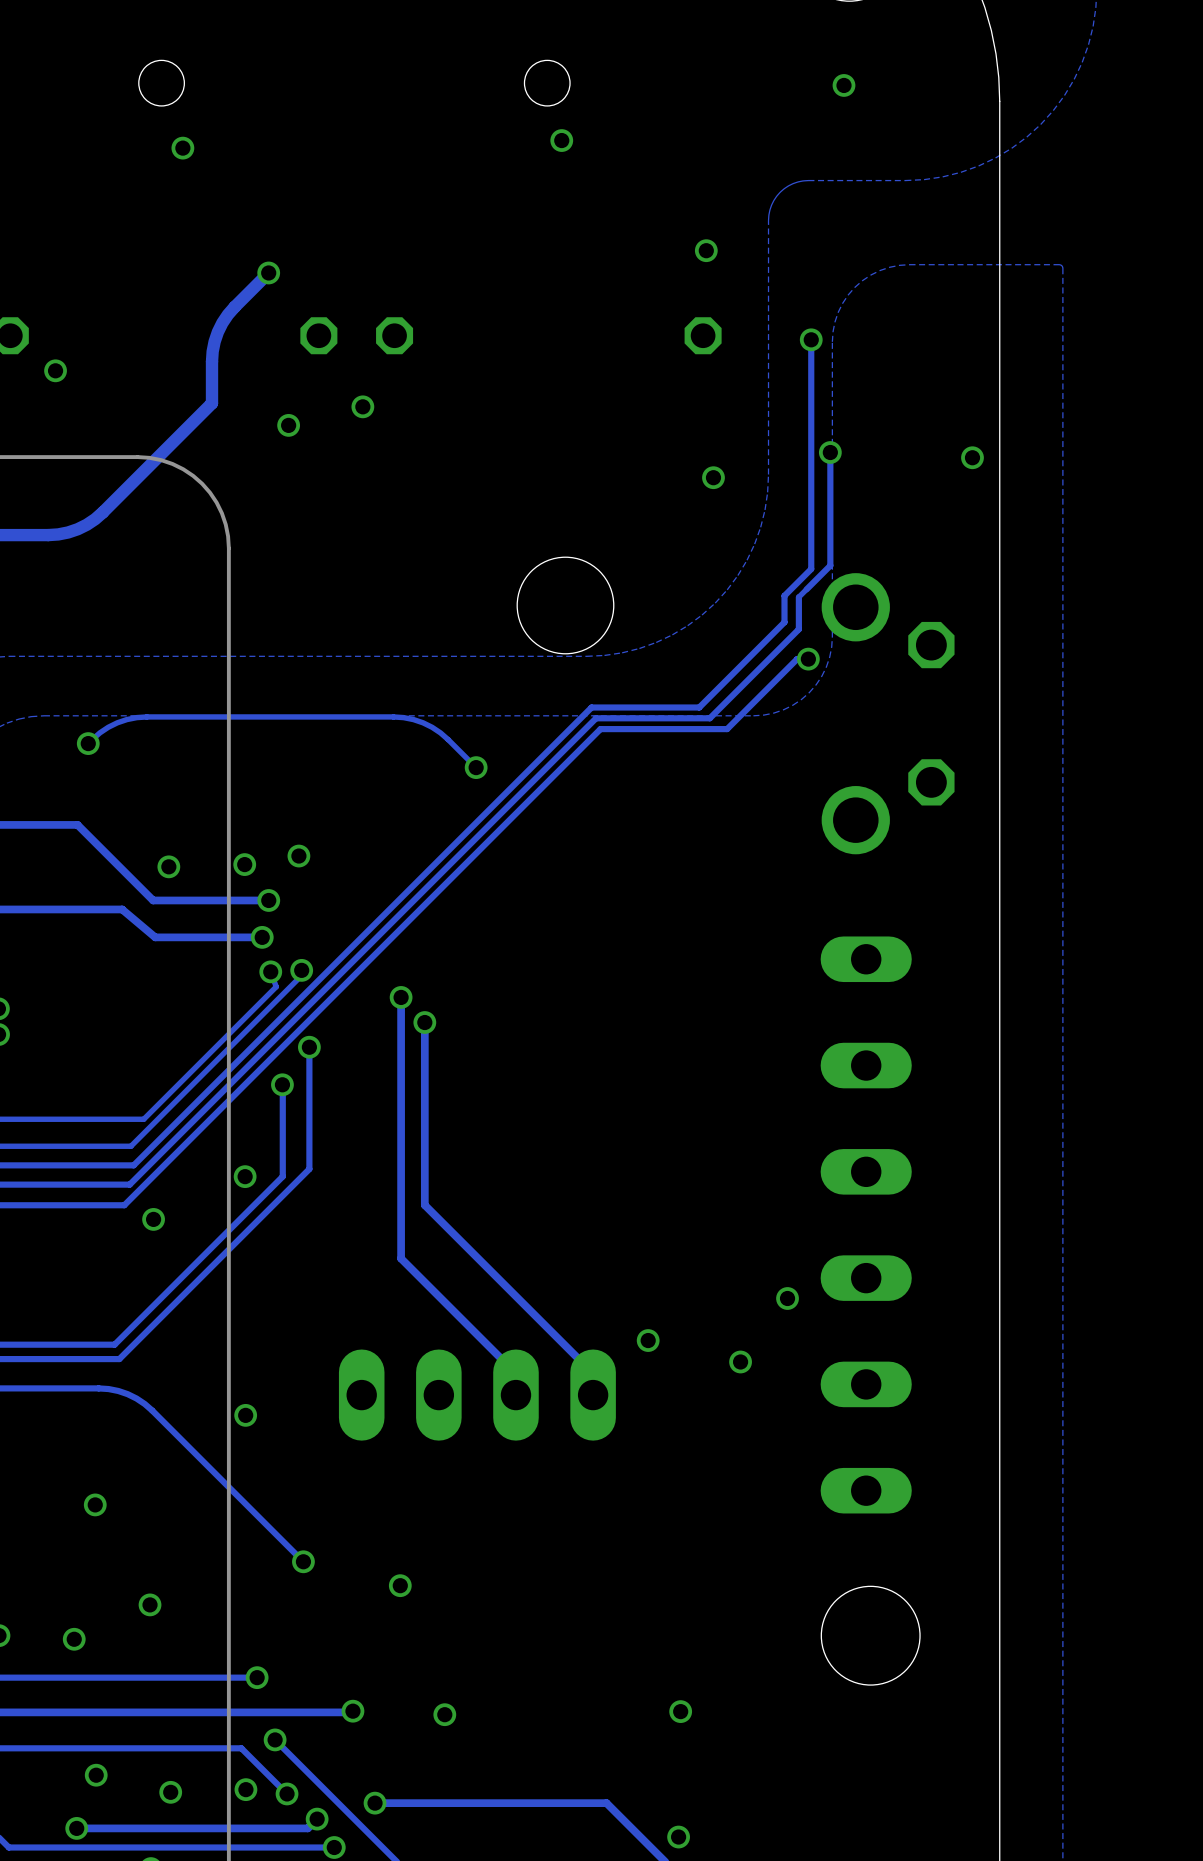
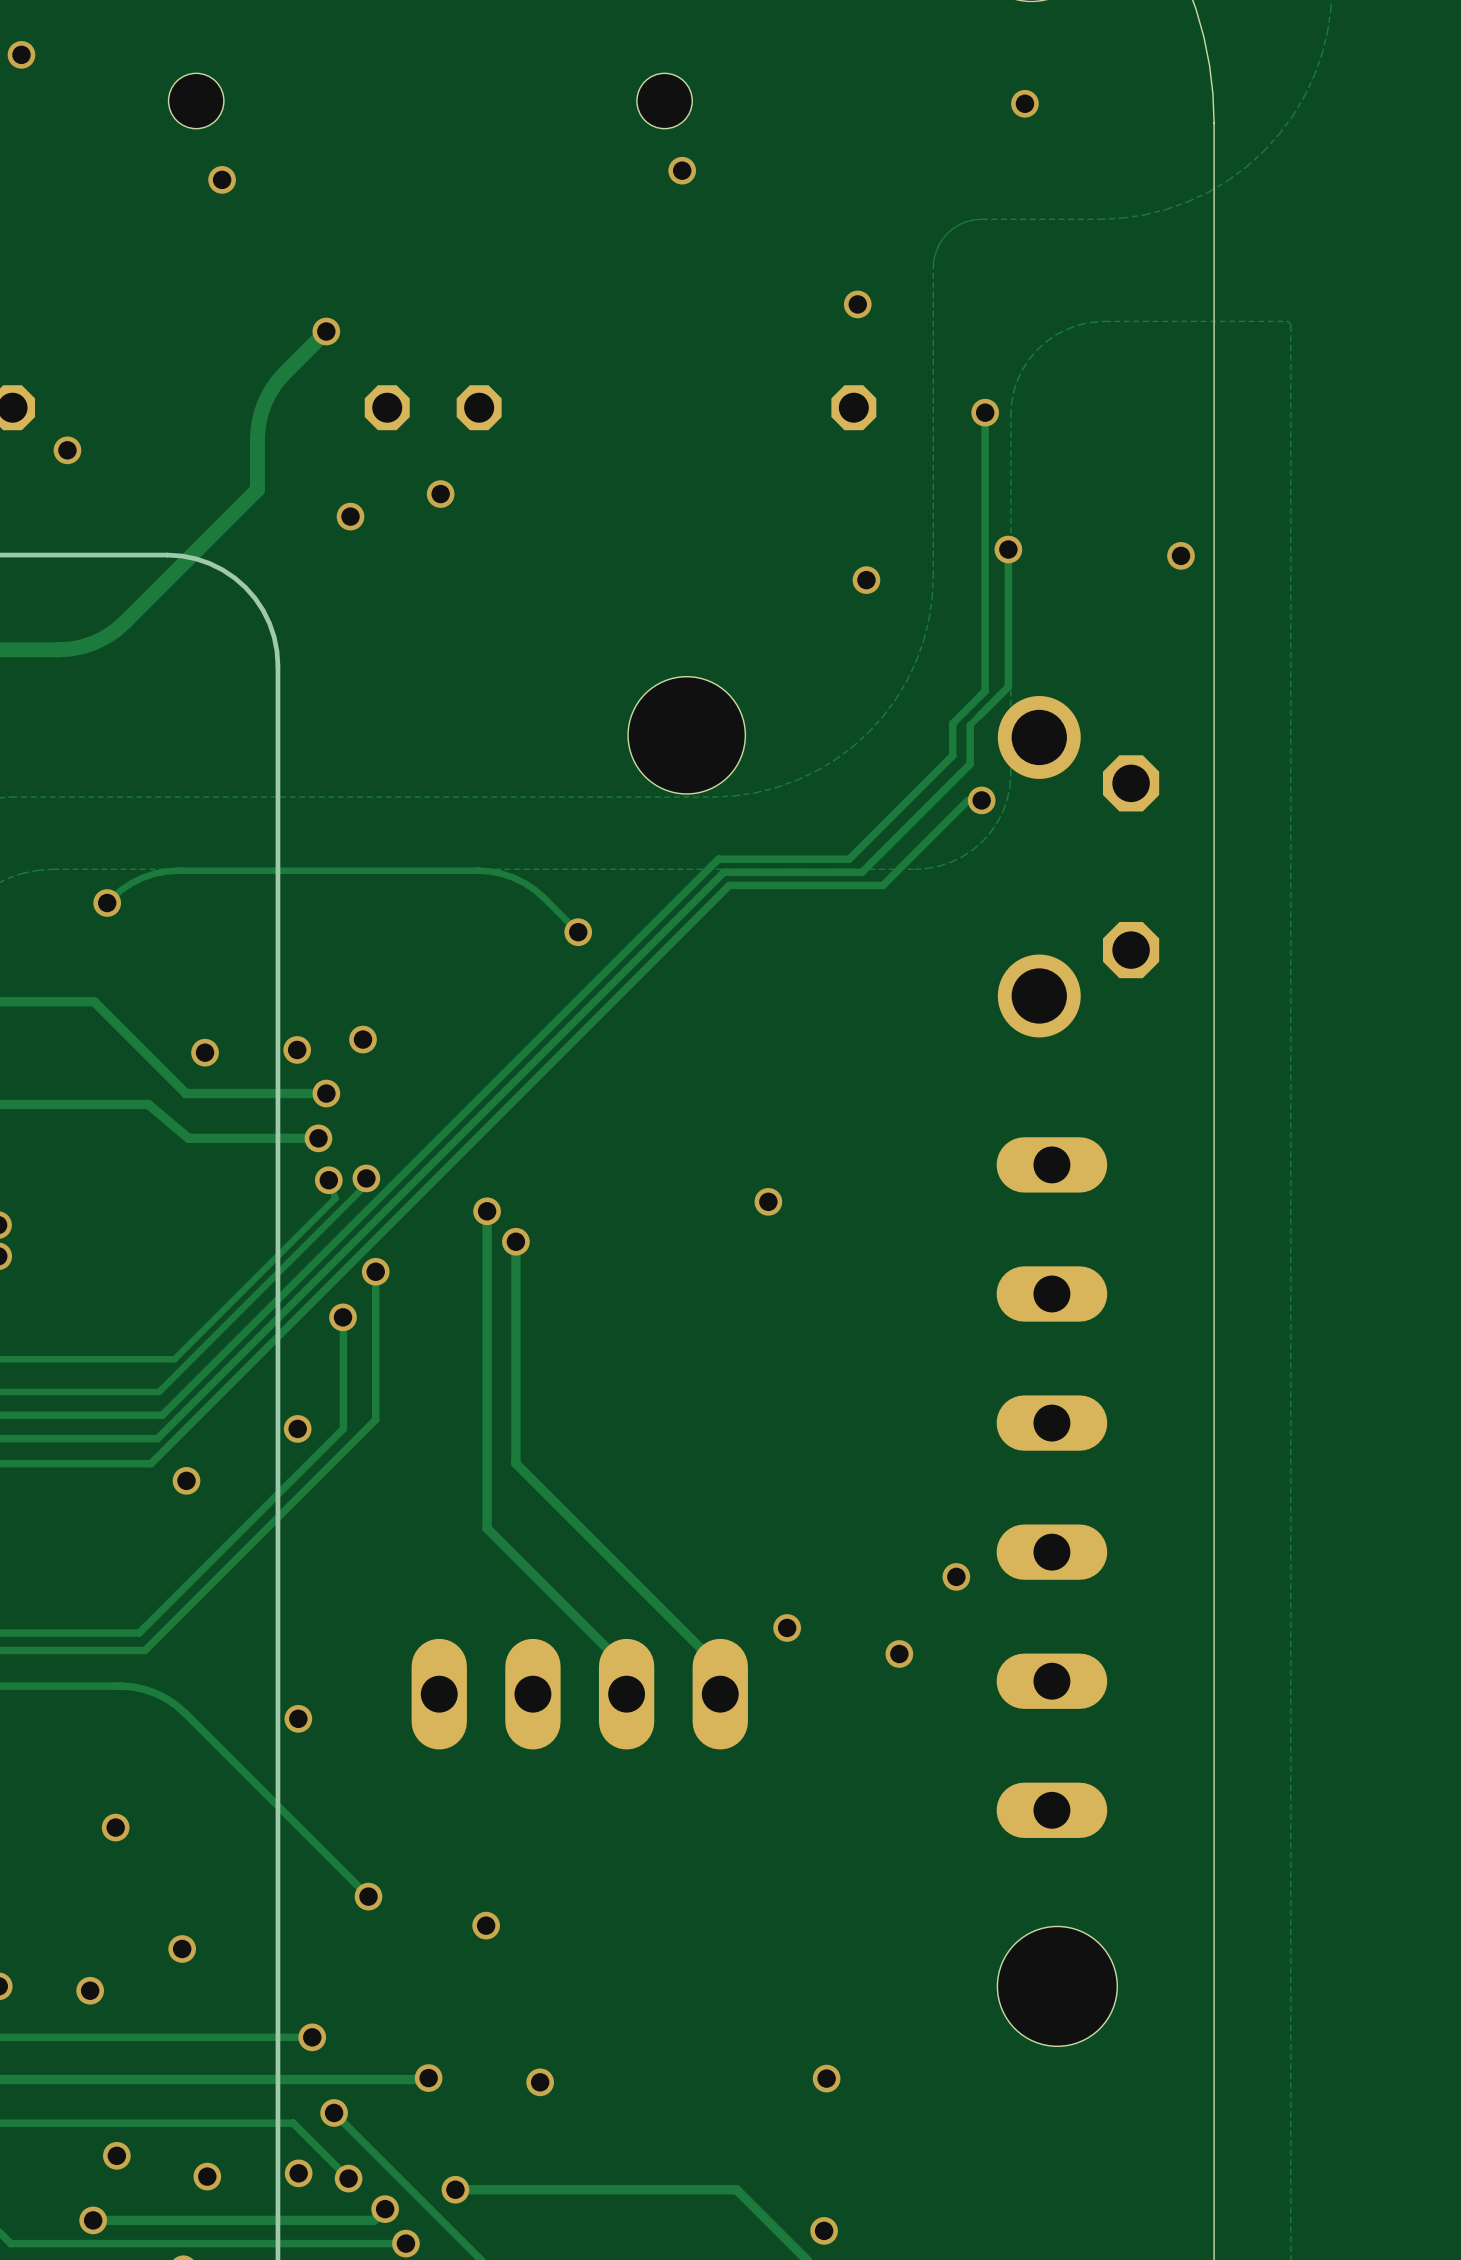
via: none -> (21, 54)
via: none -> (768, 1201)

